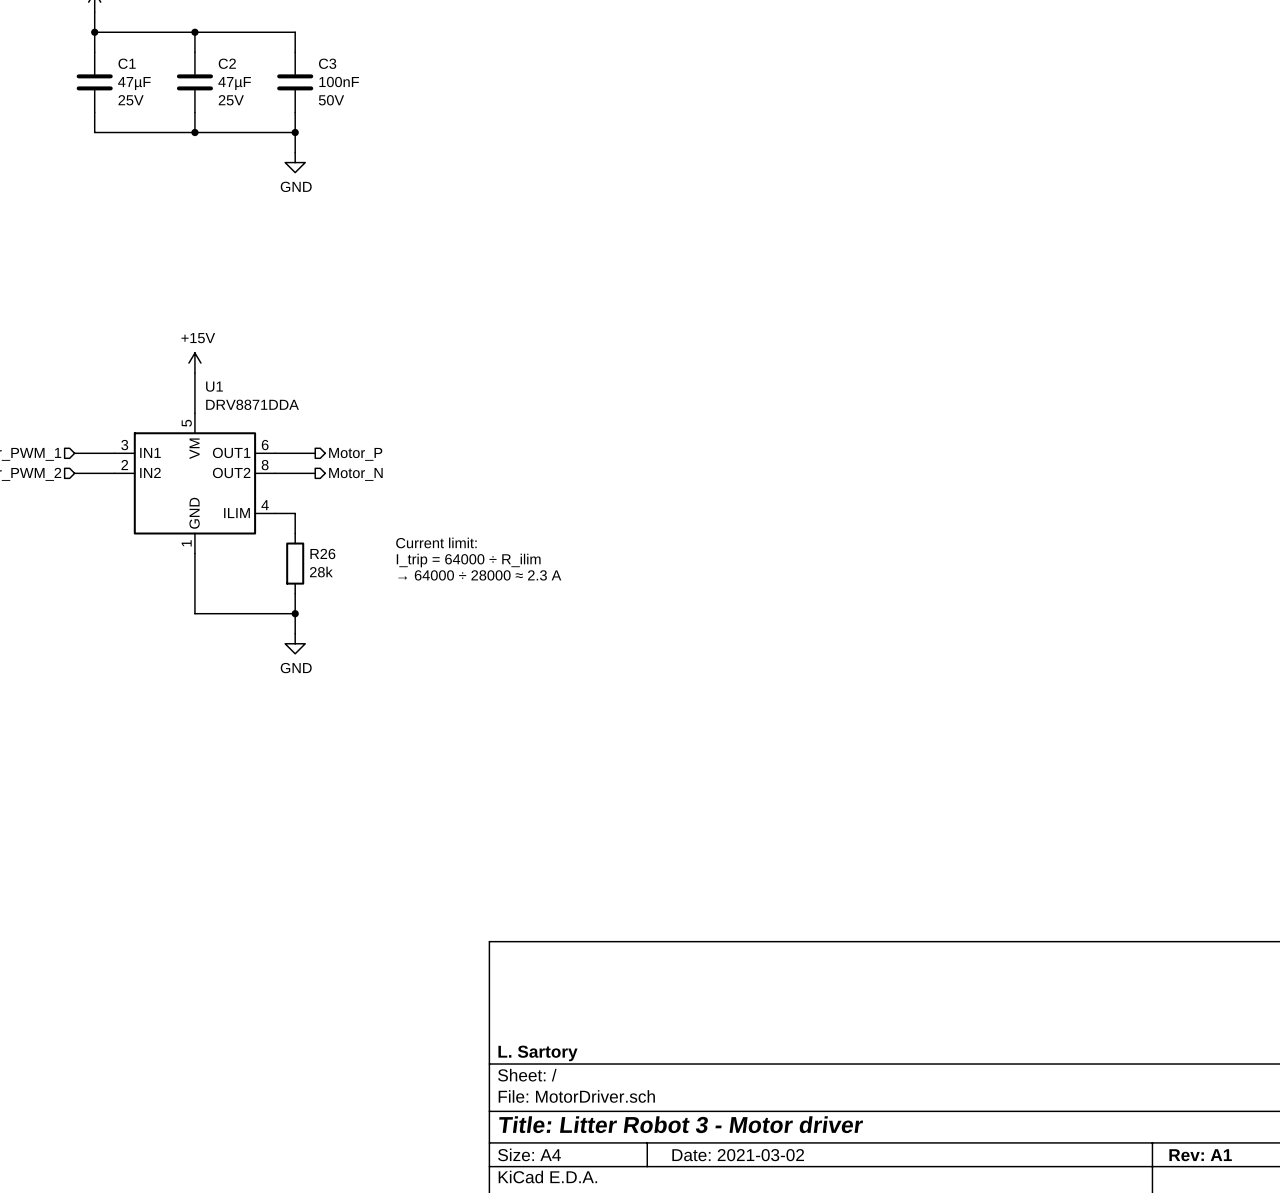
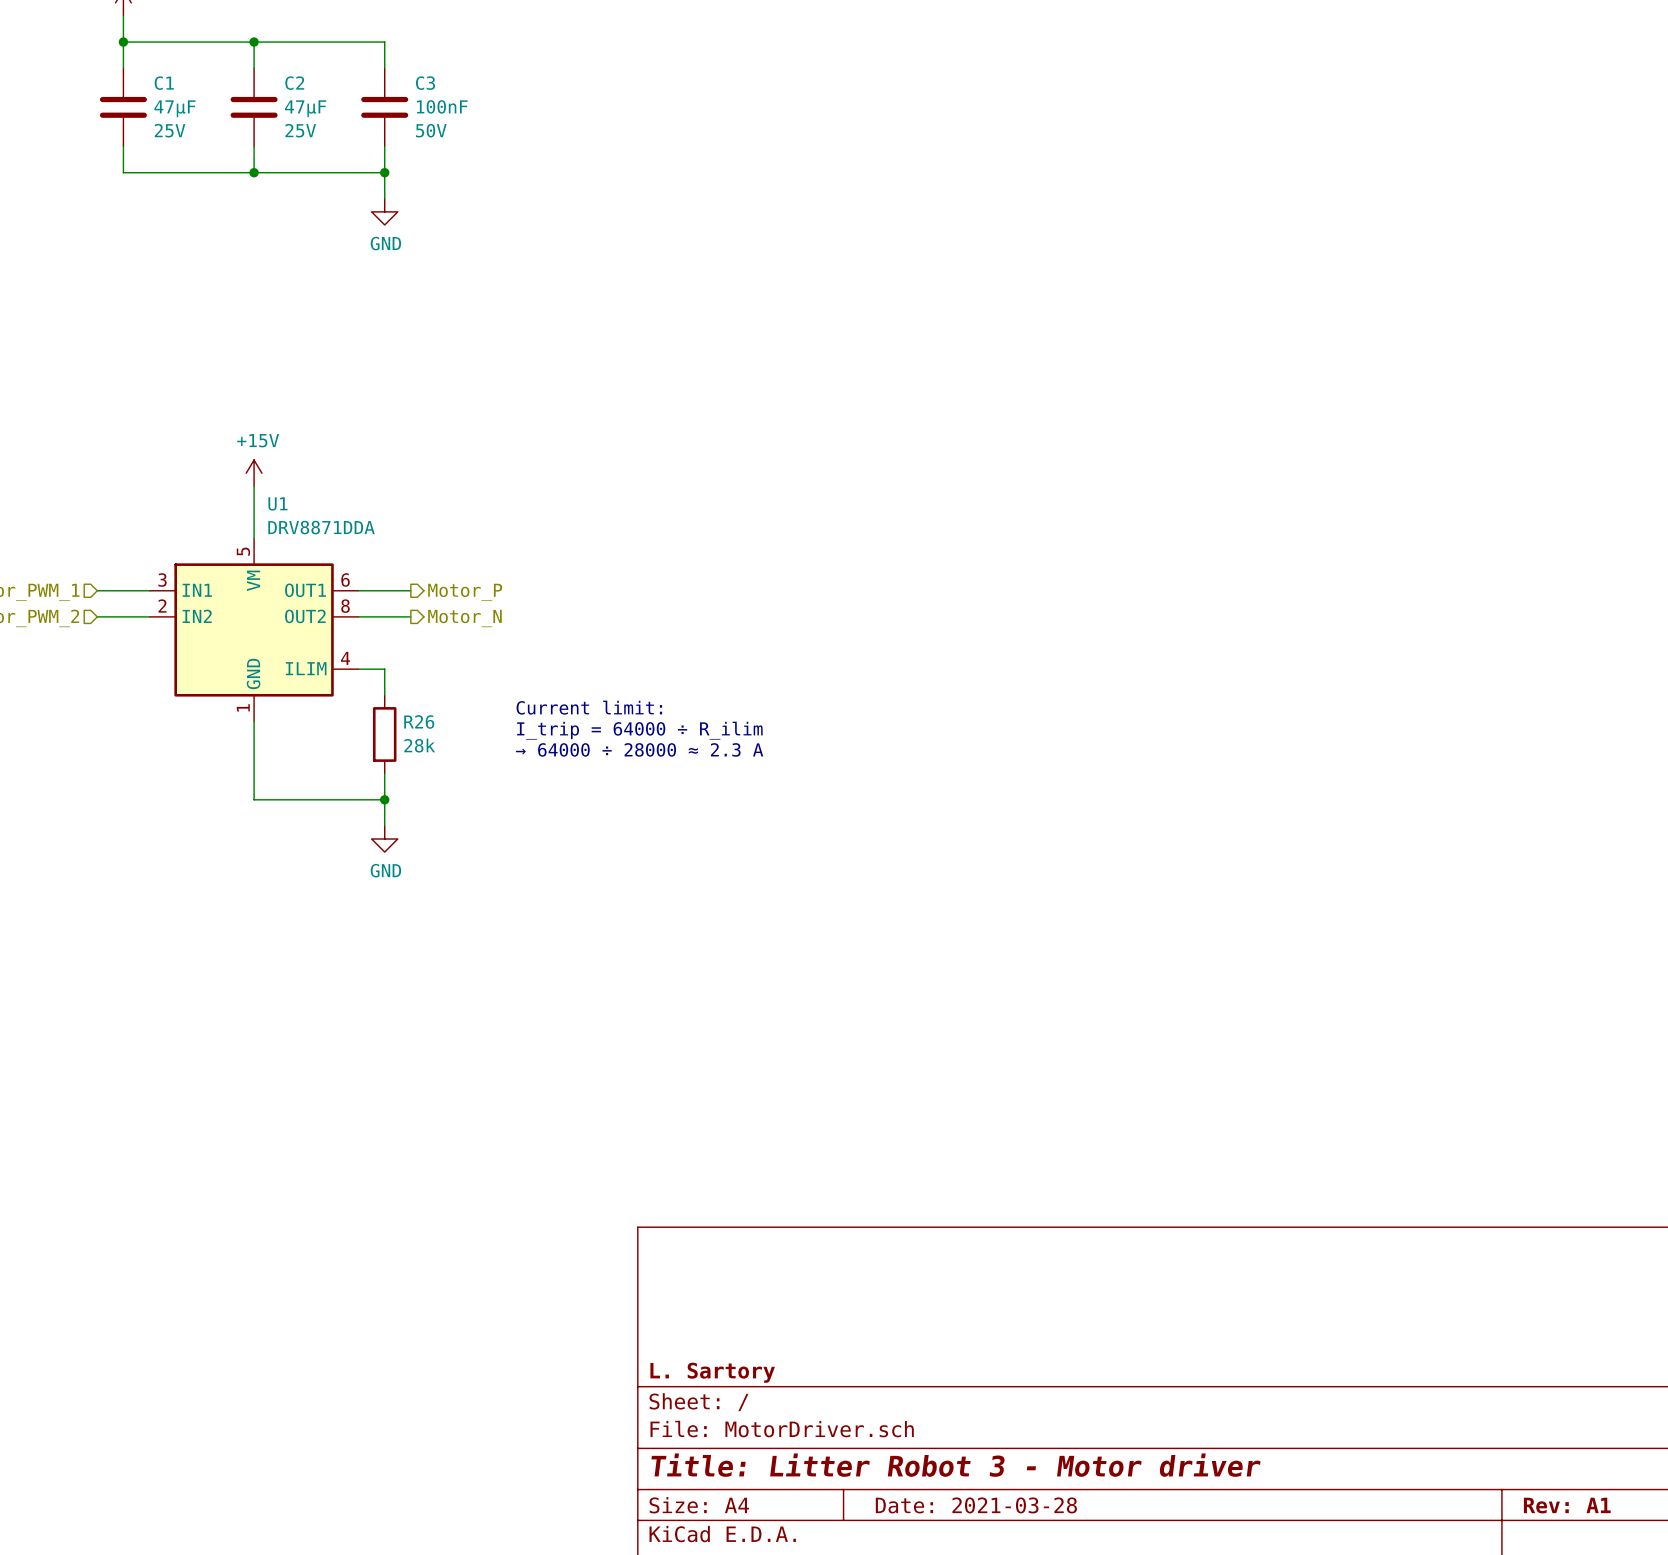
title block: Date: 2021-03-02 (738, 1155) -> Date: 2021-03-28 (976, 1505)

